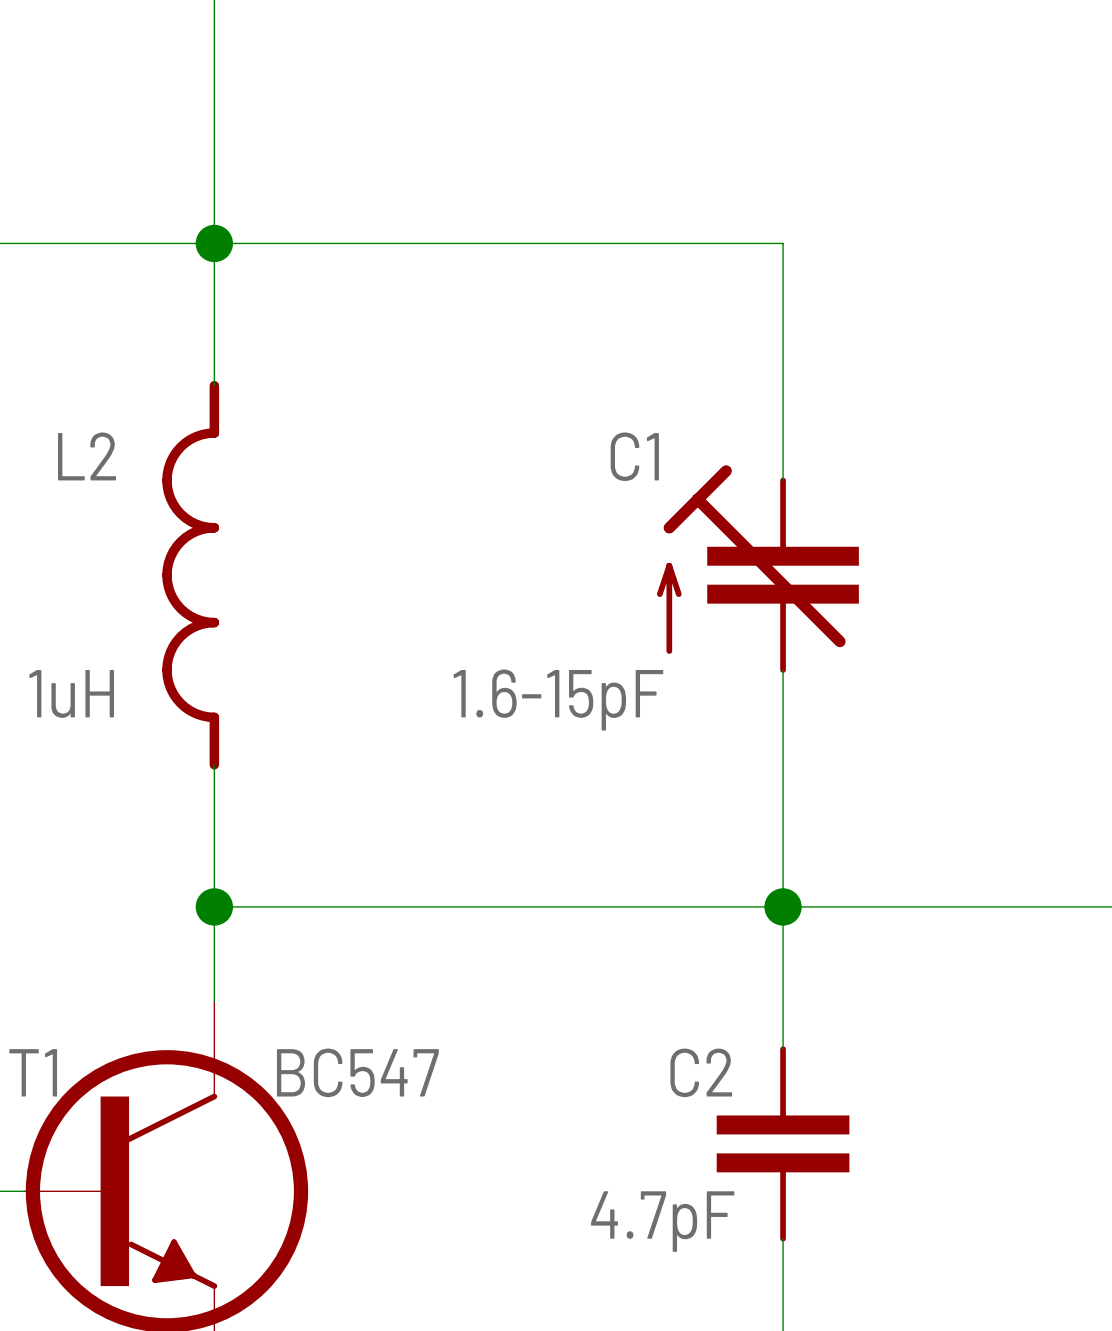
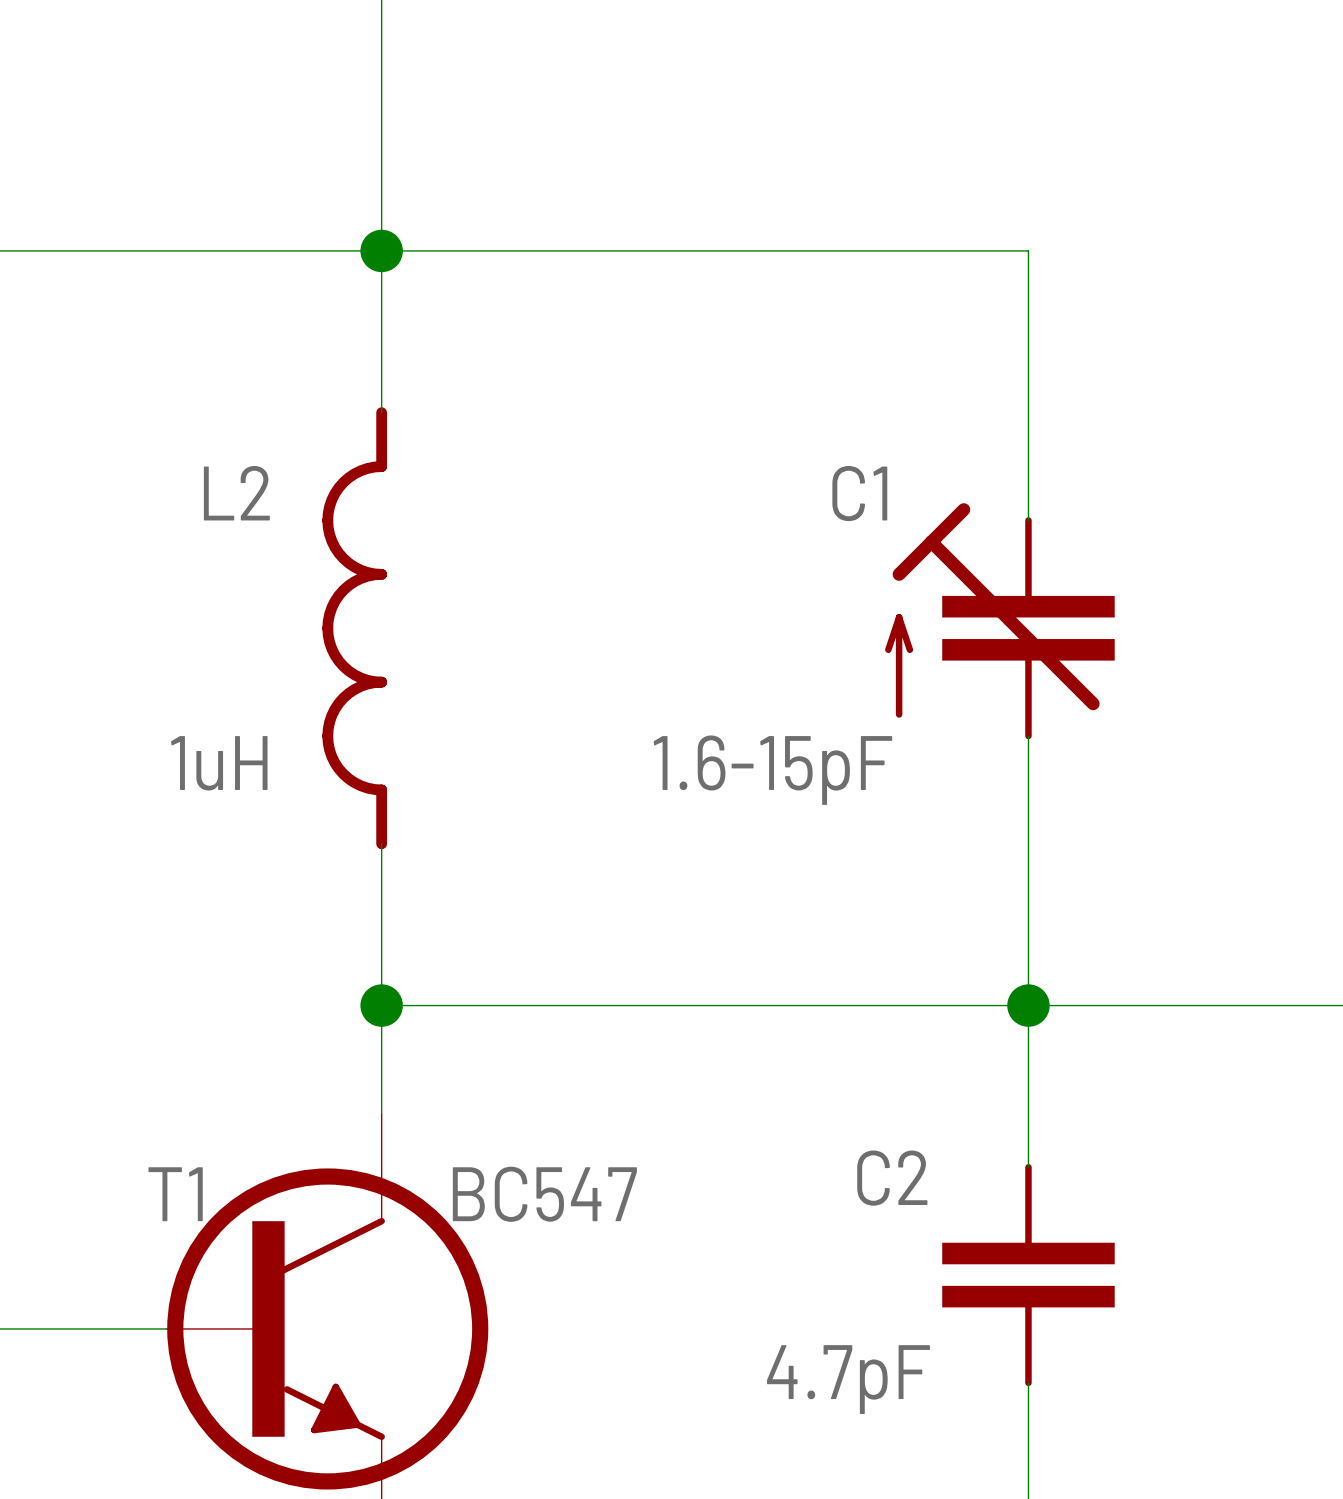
C2 symbol: [716, 1046, 850, 1242] -> [942, 1164, 1115, 1387]
C2 name position: C2 (701, 1072) -> C2 (892, 1178)
C2 value position: 4.7pF (662, 1221) -> 4.7pF (848, 1379)

